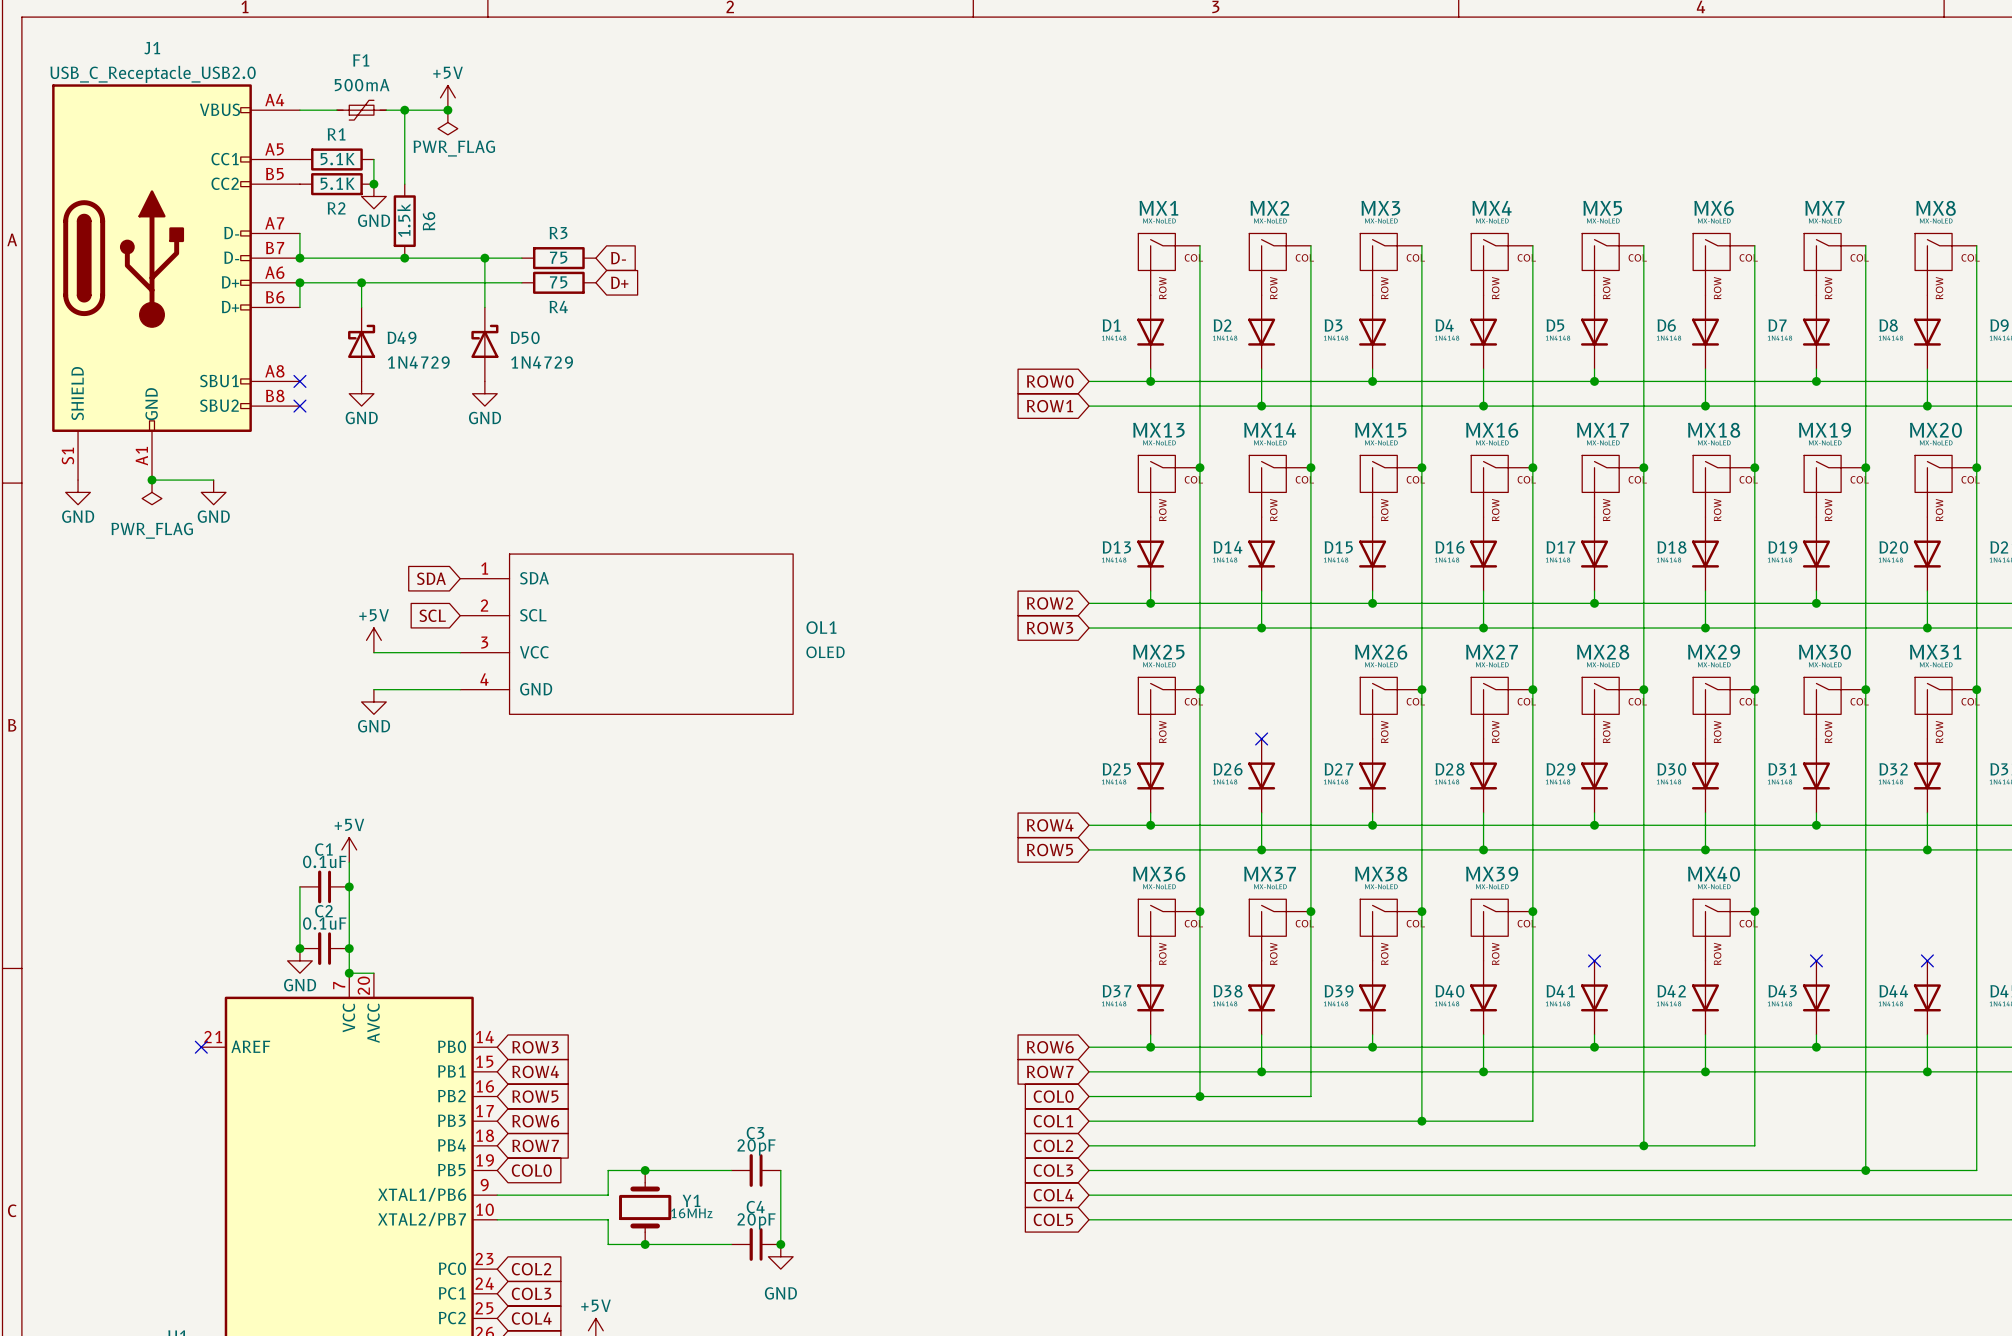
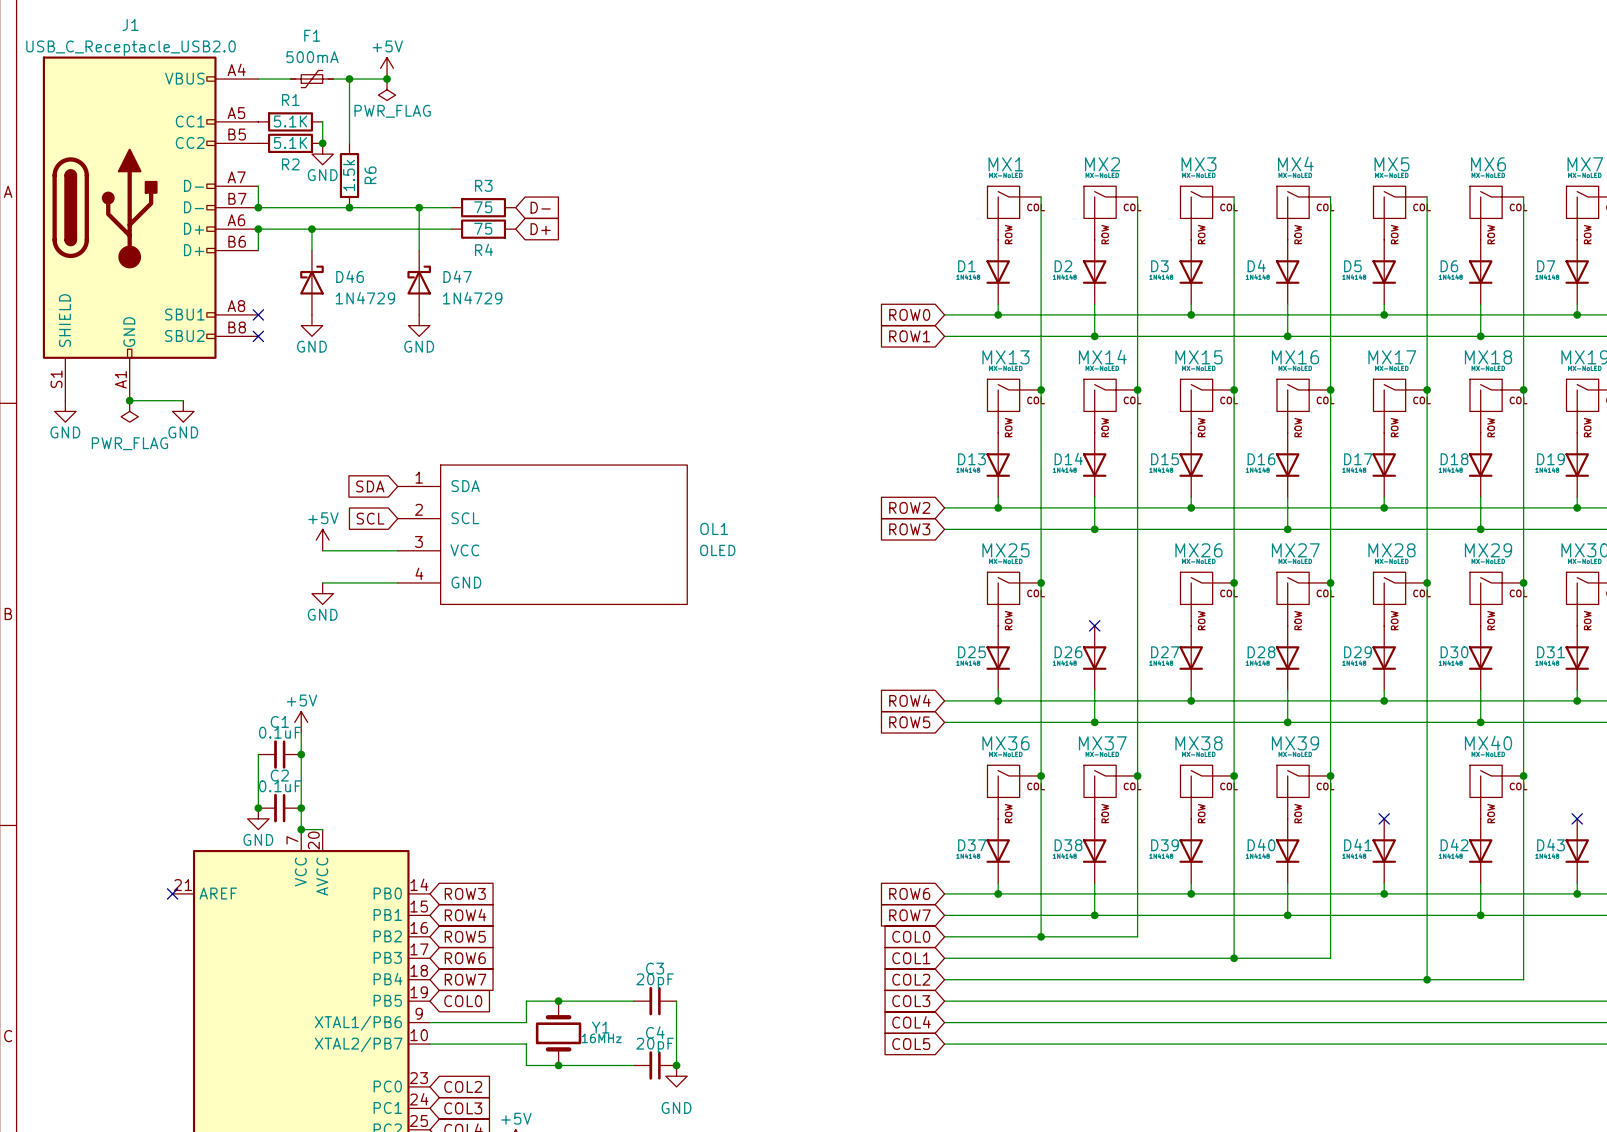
D49 name: D49 (402, 337) -> D46 (350, 276)
D50 name: D50 (525, 337) -> D47 (457, 276)

